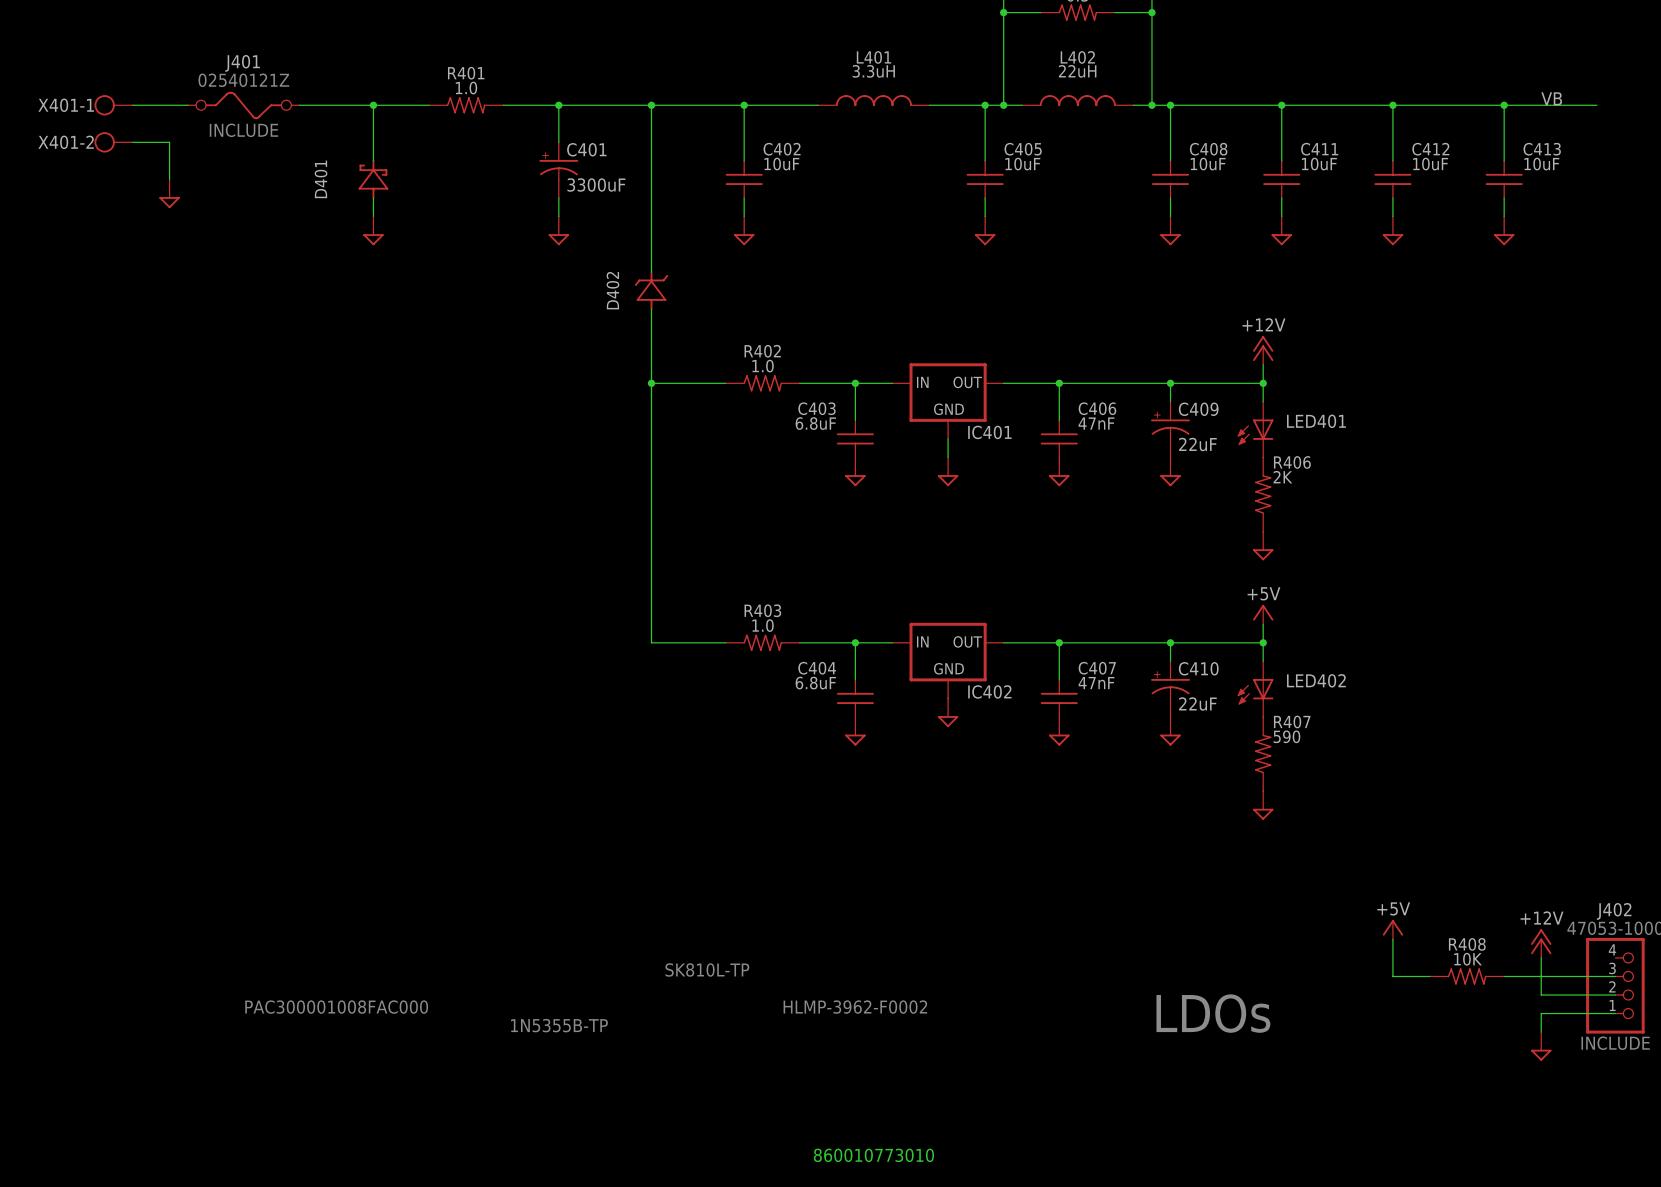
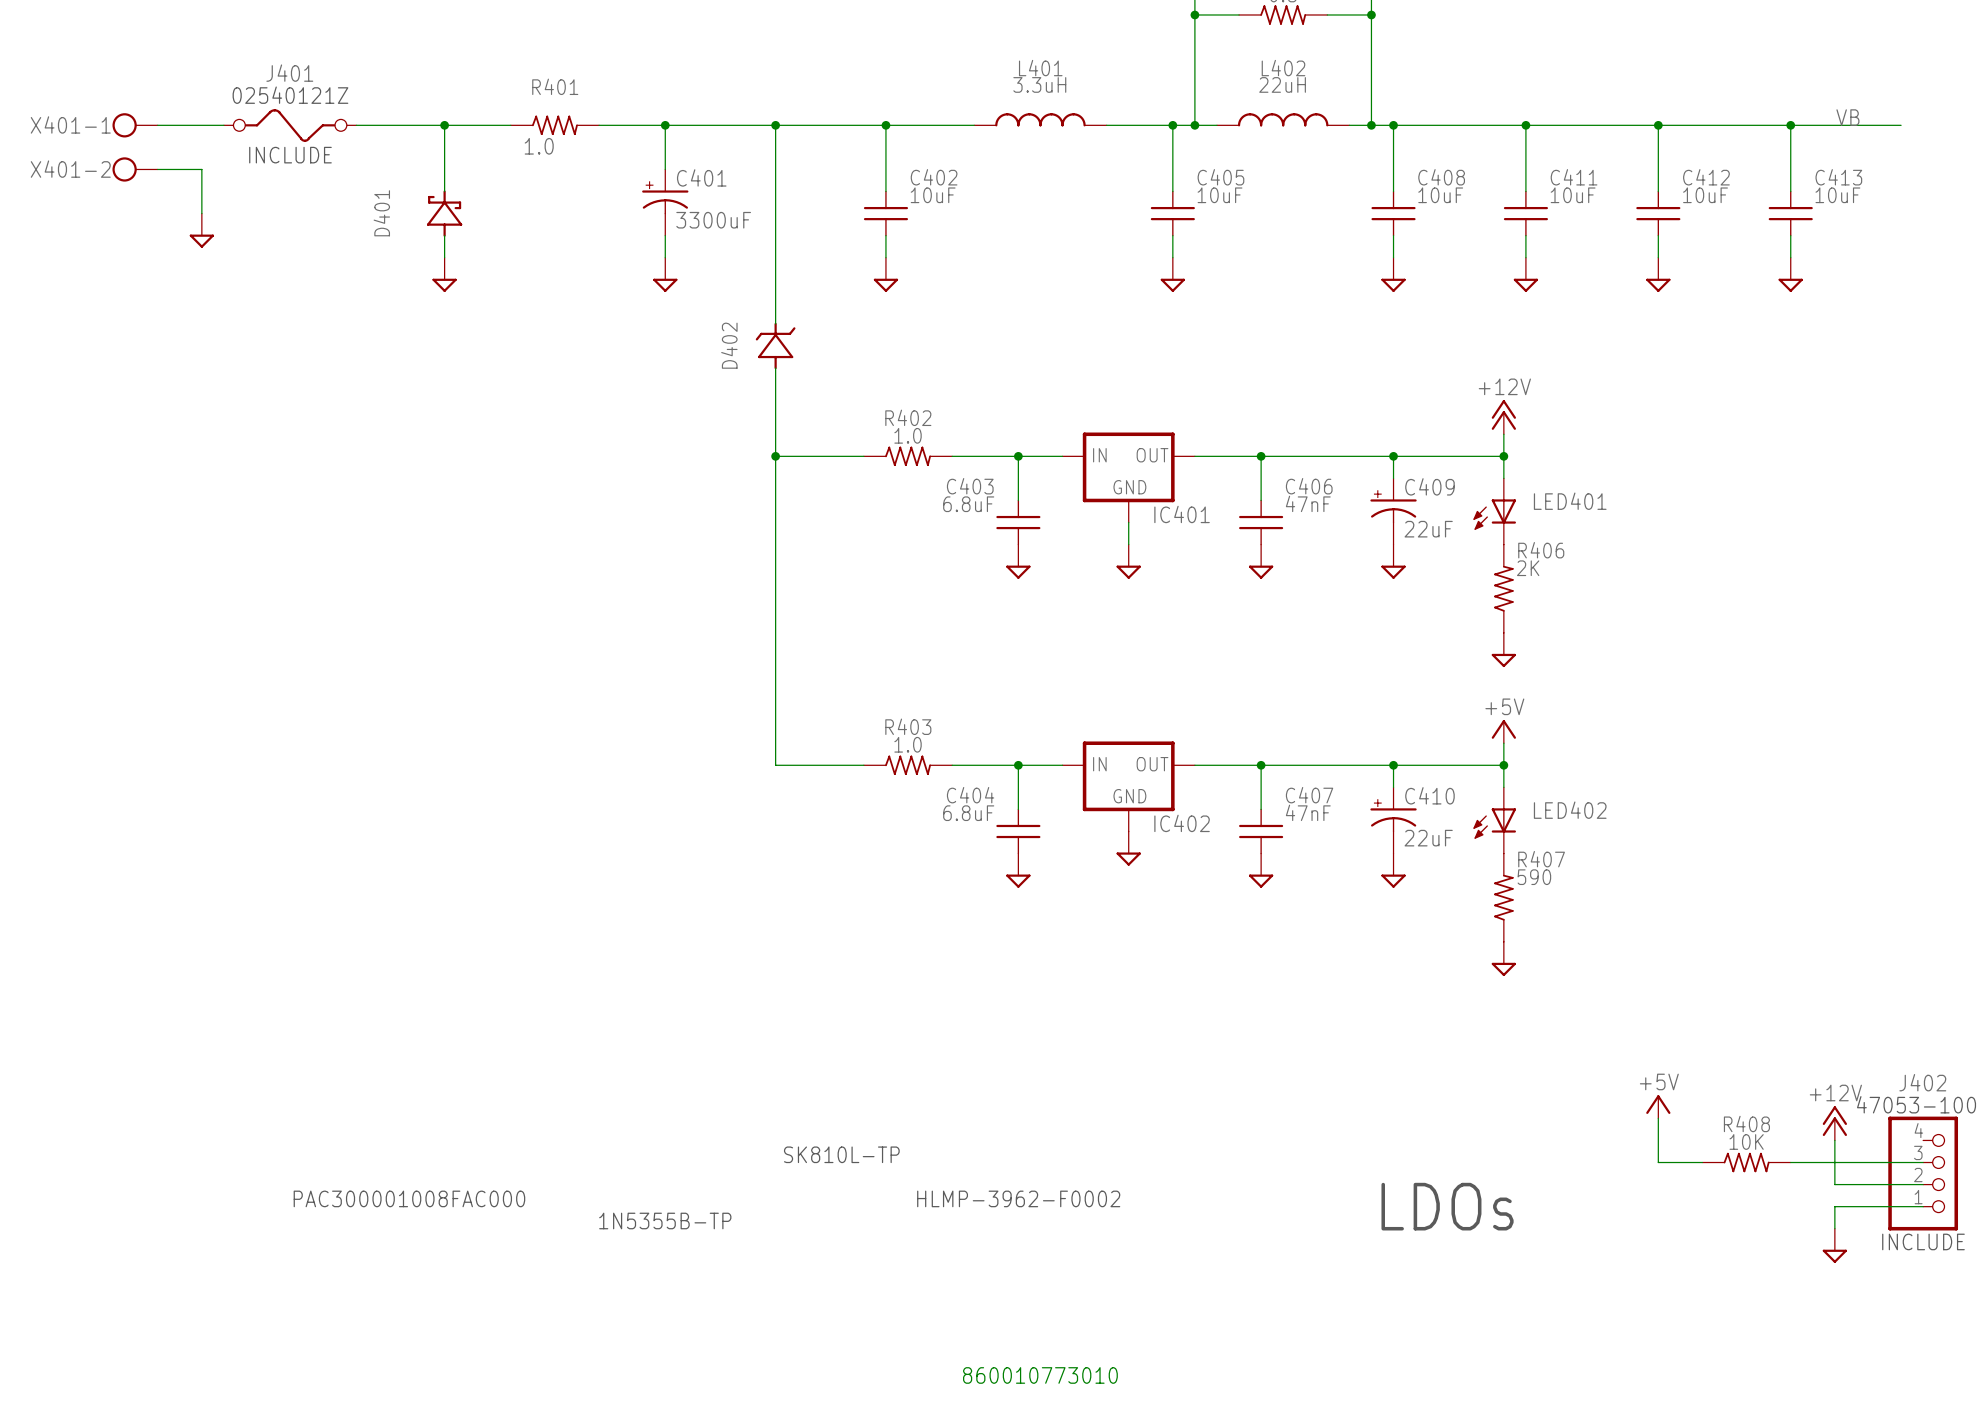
R401 value position: 1.0 (466, 88) -> 1.0 (539, 146)

